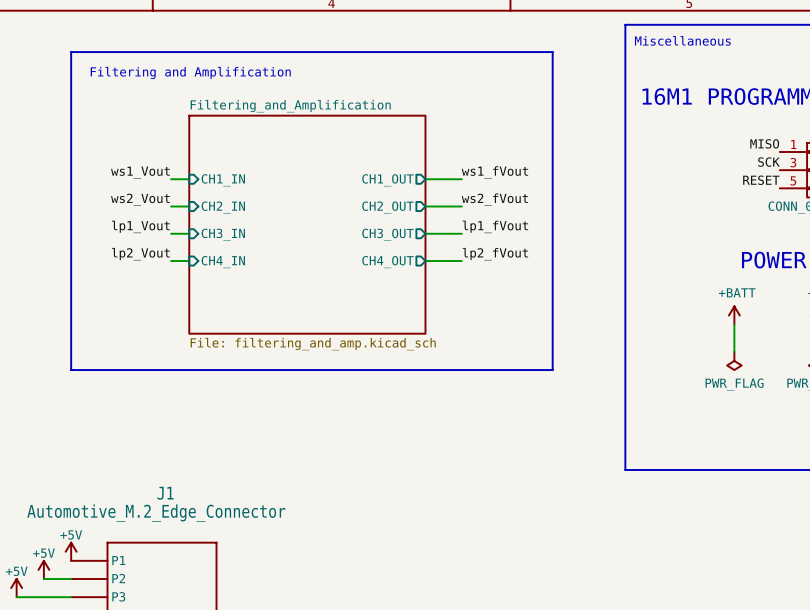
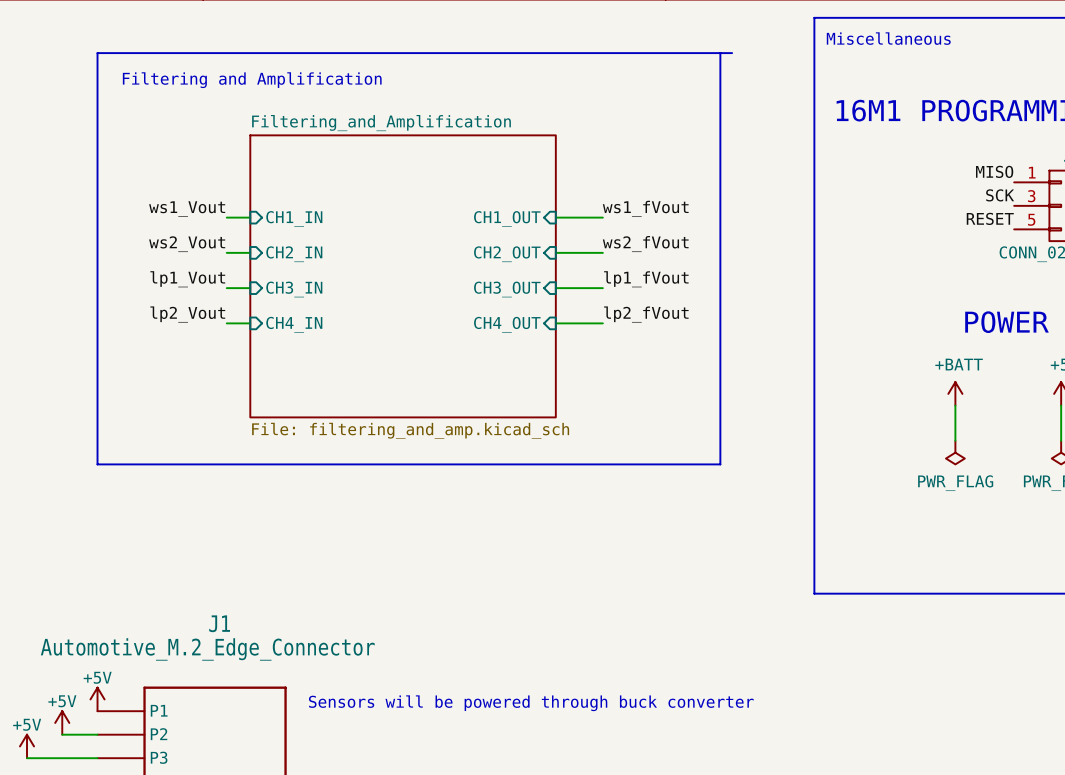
line: none -> (720, 53) (732, 53)
sheet pin shape: output (387, 180) -> input (507, 218)
sheet pin shape: output (387, 207) -> input (507, 254)
sheet pin shape: output (387, 234) -> input (507, 289)
sheet pin shape: output (387, 262) -> input (507, 324)
text: none -> Sensors will be powered through buck converter (531, 703)

